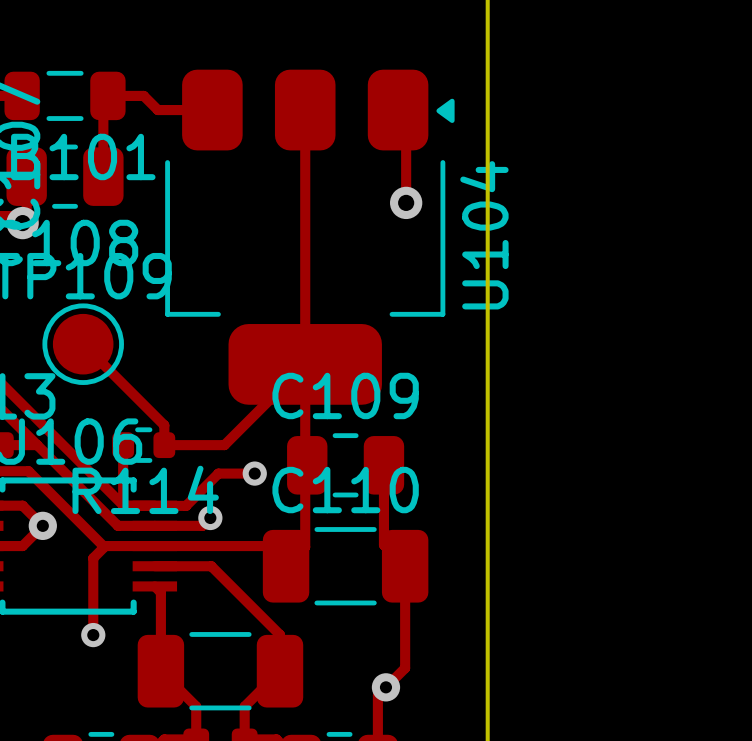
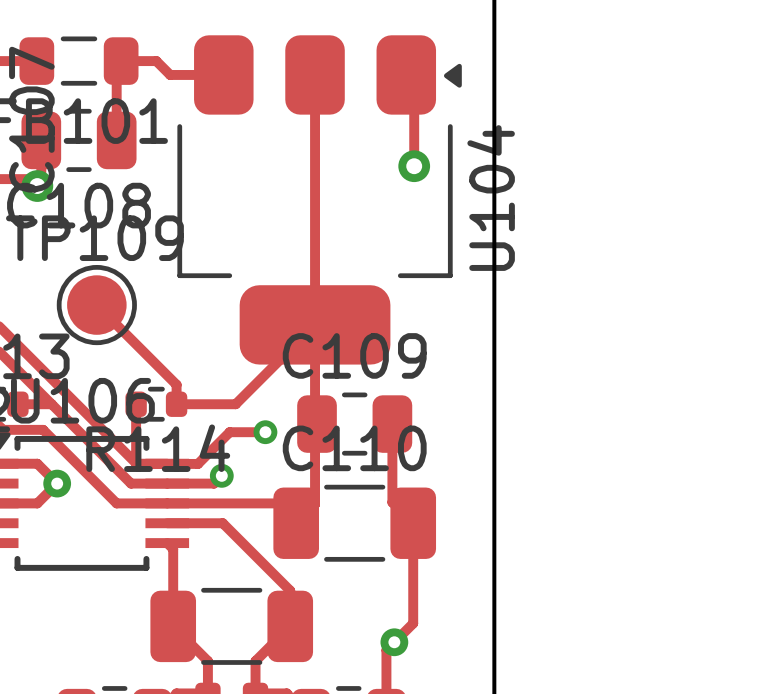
track: (105, 546) (93, 558) (93, 635) -> none
via: (93, 635) -> none

